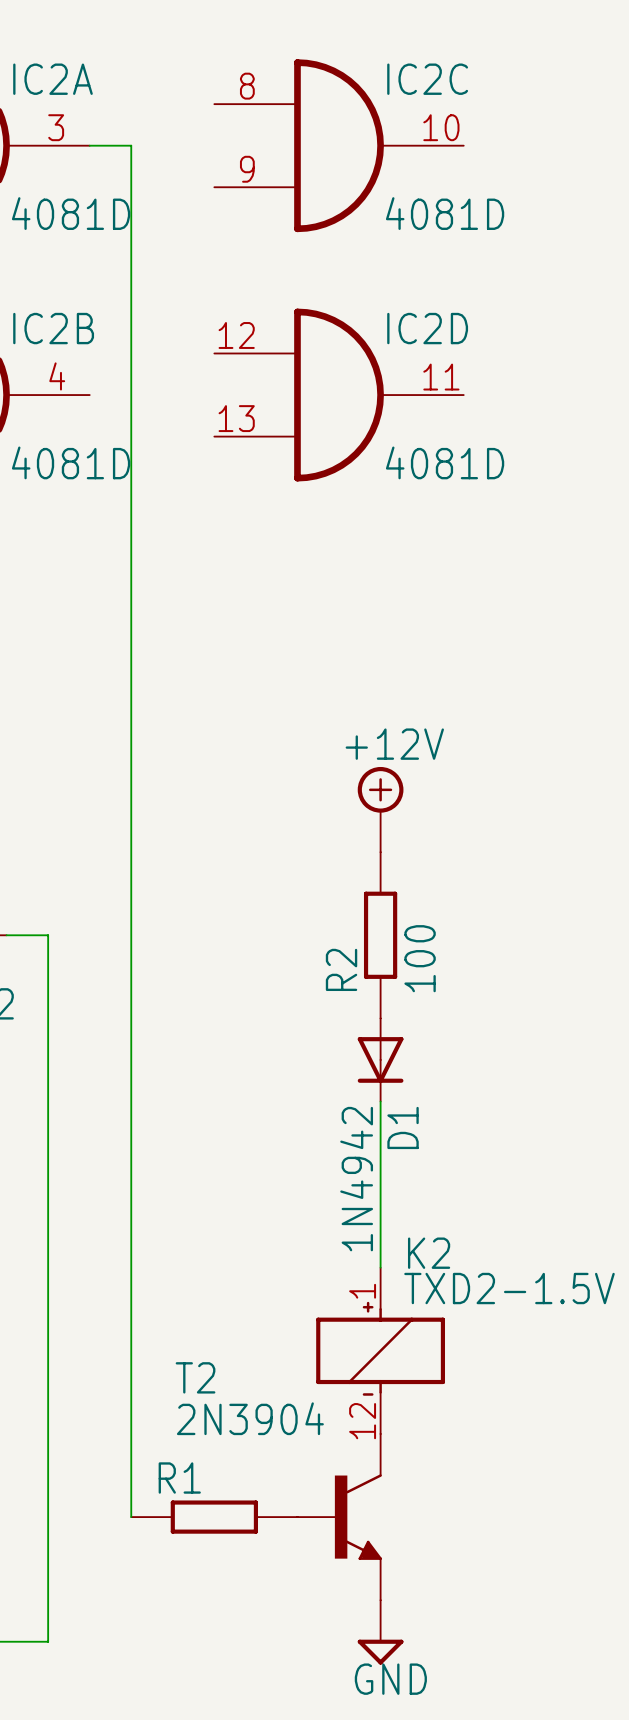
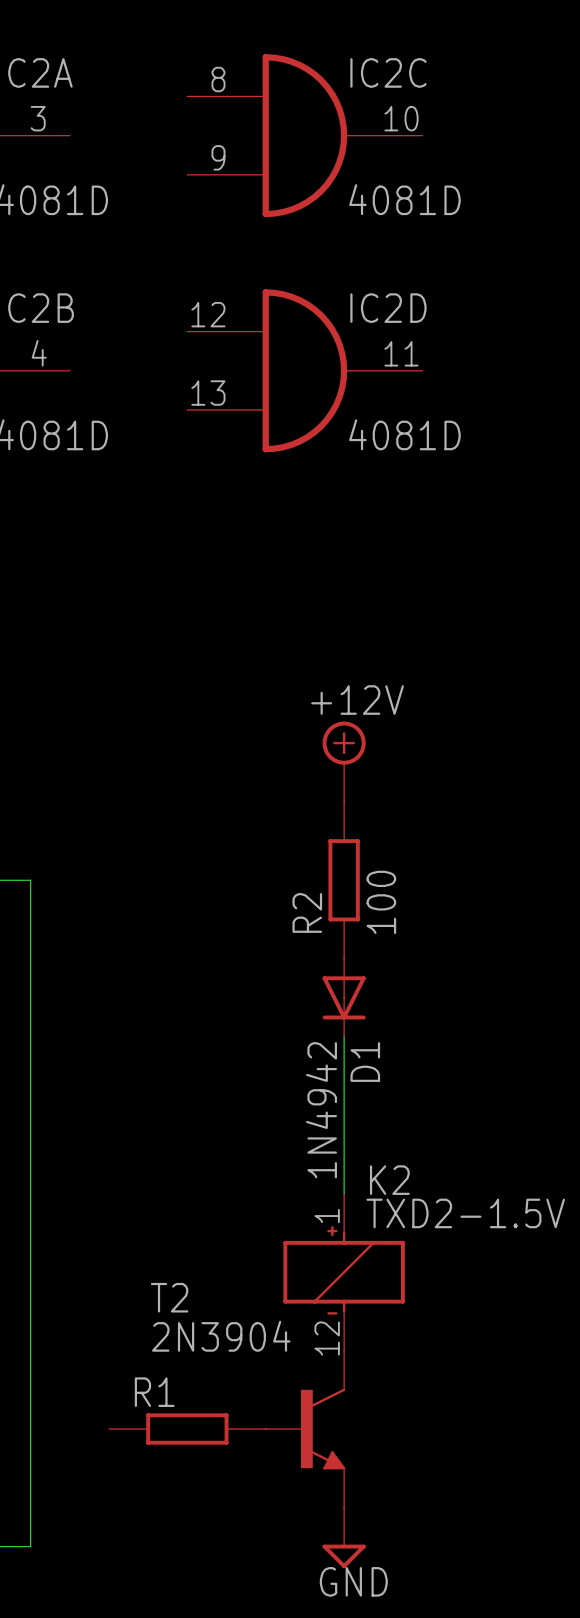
wire: (89, 145) (131, 145) (131, 1517) -> none

